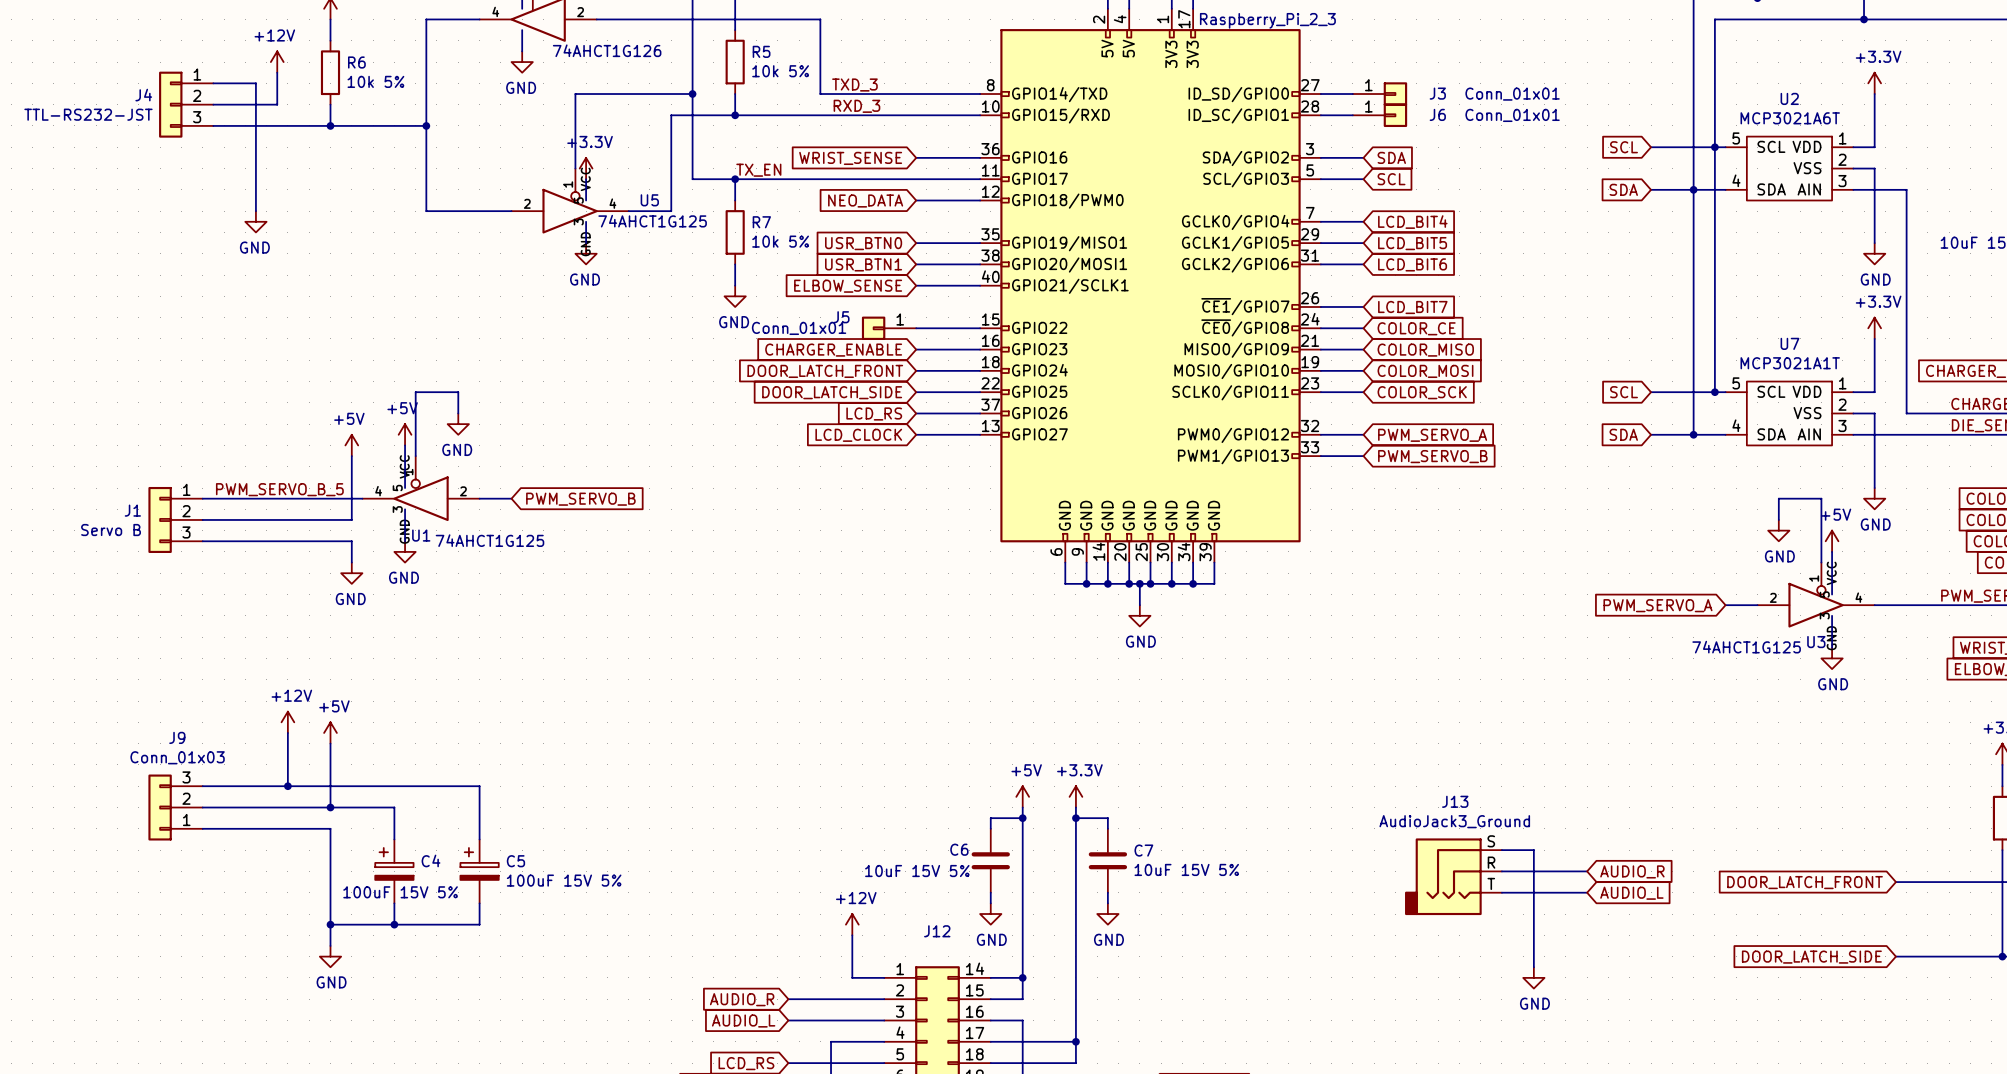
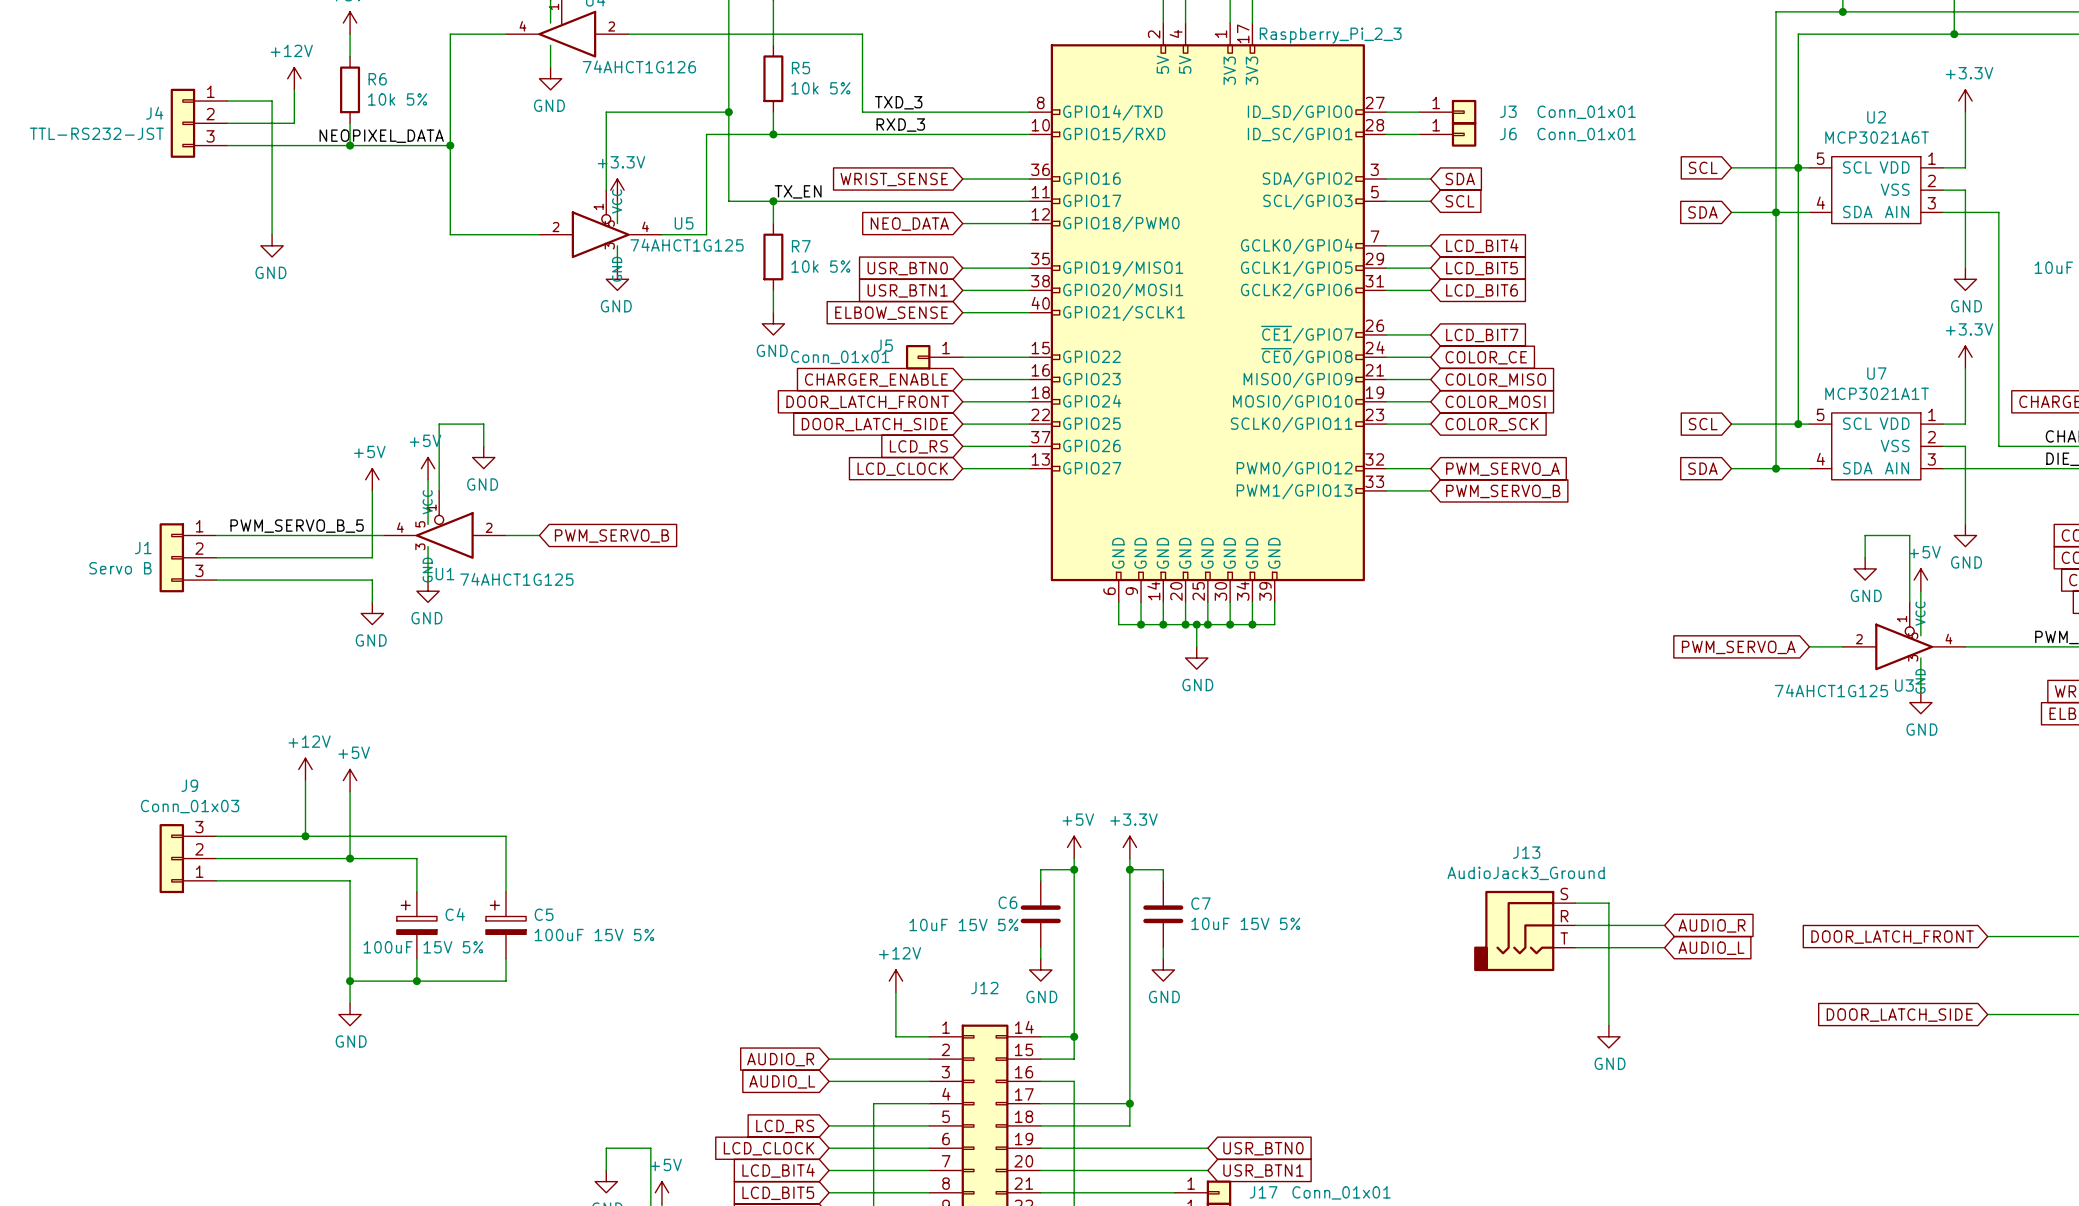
label: none -> NEOPIXEL_DATA (381, 136)

